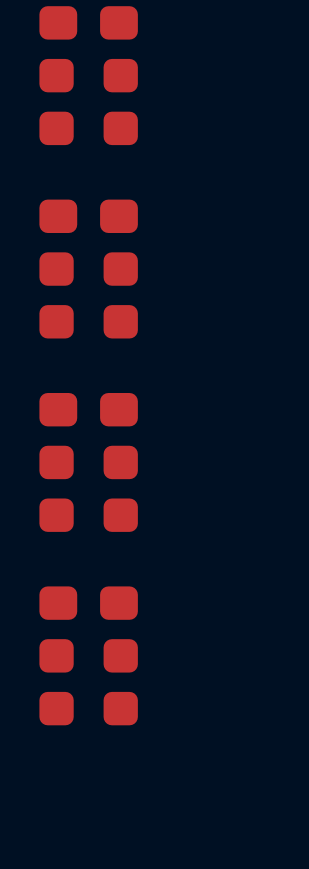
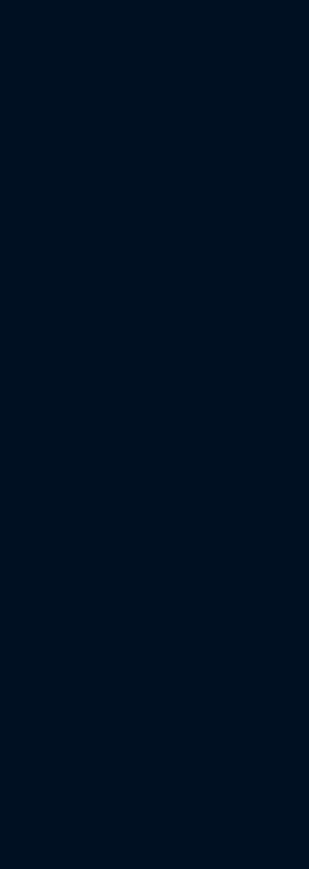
part: (88, 22) -> none
part: (88, 75) -> none
part: (88, 128) -> none
part: (88, 216) -> none
part: (88, 269) -> none
part: (88, 321) -> none
part: (88, 409) -> none
part: (88, 462) -> none
part: (88, 515) -> none
part: (88, 603) -> none
part: (88, 655) -> none
part: (88, 708) -> none

